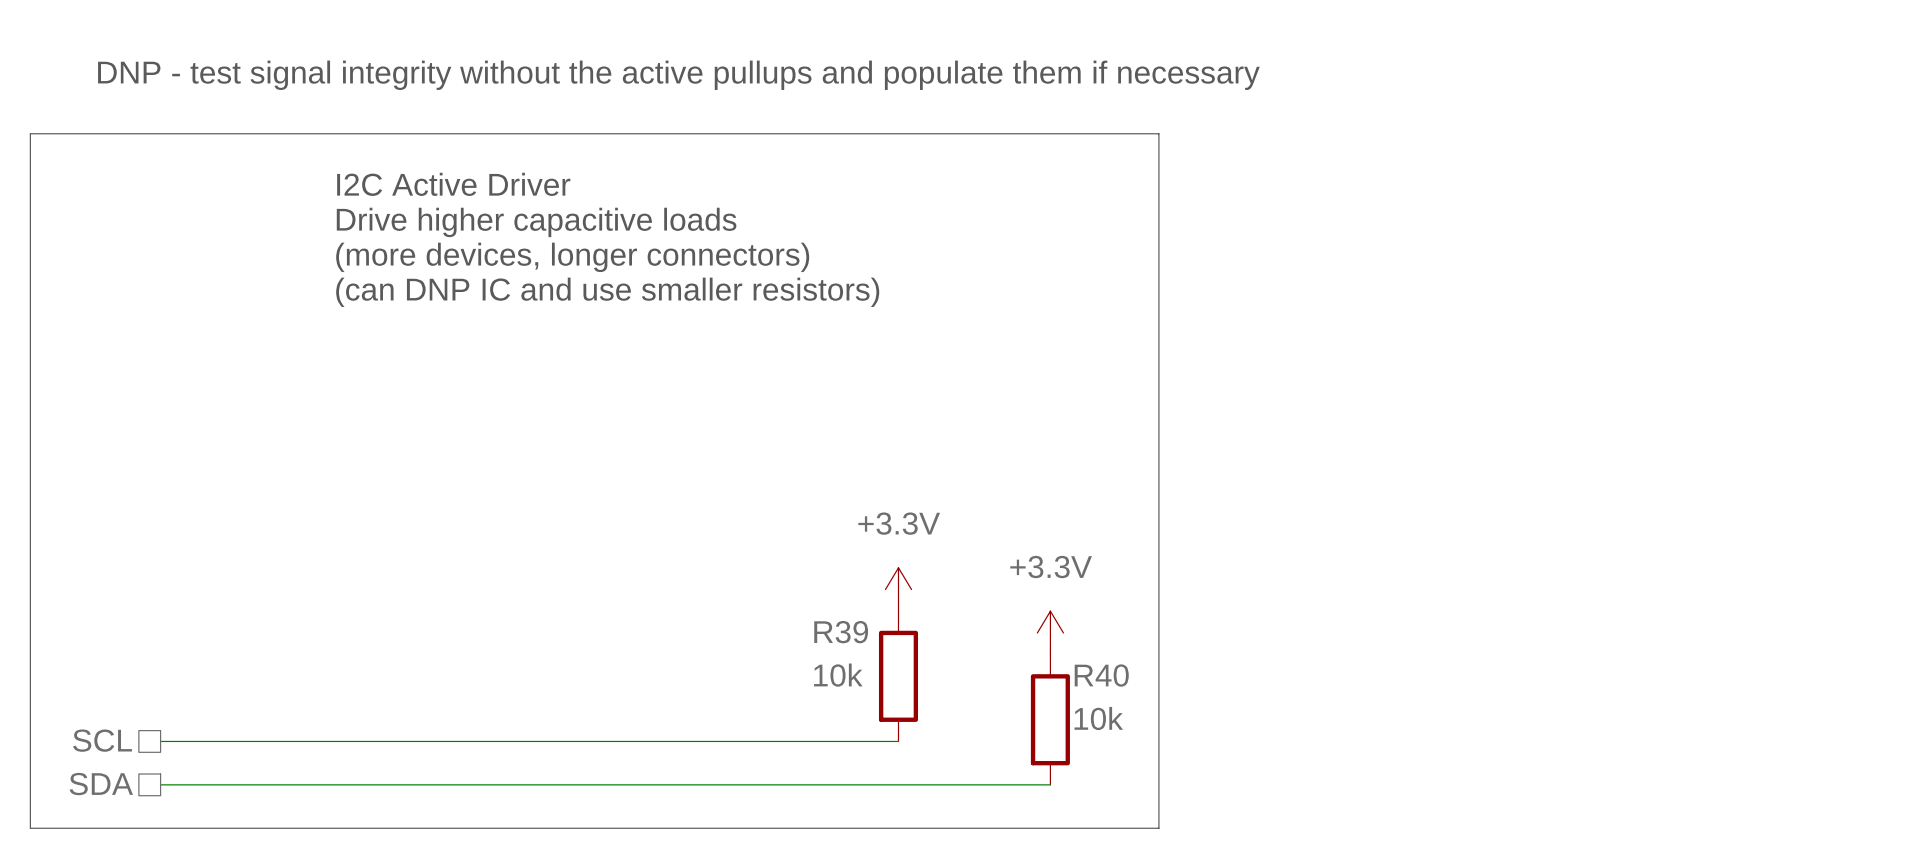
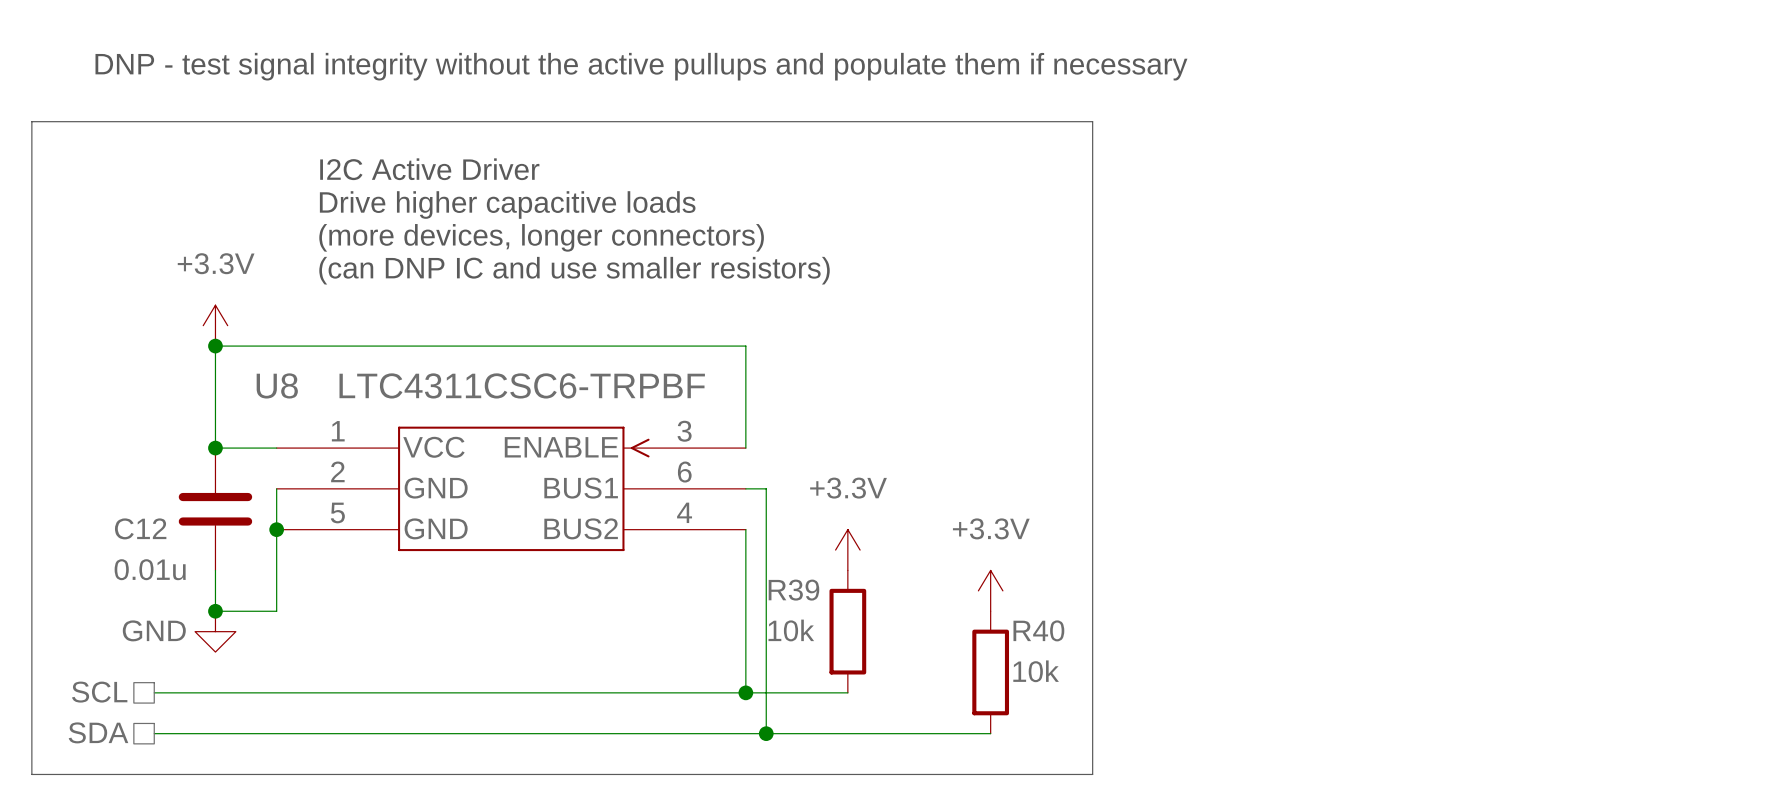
power symbol: none -> +3.3V (215, 325)
junction: none -> (215, 346)
junction: none -> (215, 448)
wire: none -> (276, 448) (215, 448) (215, 346) (745, 346) (745, 448)
wire: none -> (276, 488) (276, 611) (215, 611) (215, 570)
U8: none -> LTC4311CSC6-TRPBF (511, 488)
wire: none -> (745, 488) (766, 488) (766, 733)
C12: none -> 0.01u (215, 509)
junction: none -> (276, 529)
wire: none -> (745, 529) (745, 692)
junction: none -> (215, 611)
power symbol: none -> GND (215, 631)
junction: none -> (745, 692)
junction: none -> (766, 733)

